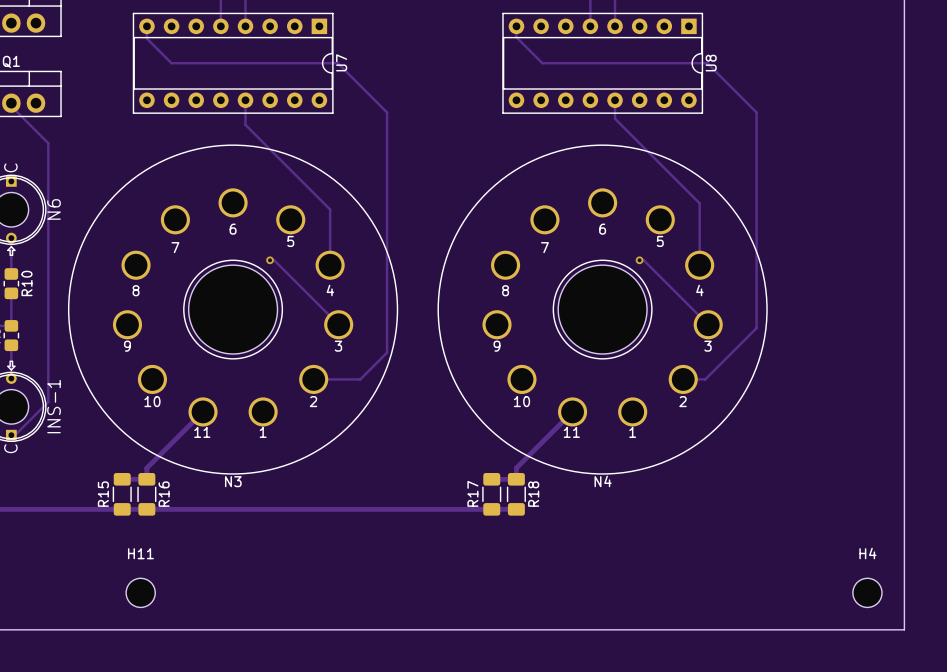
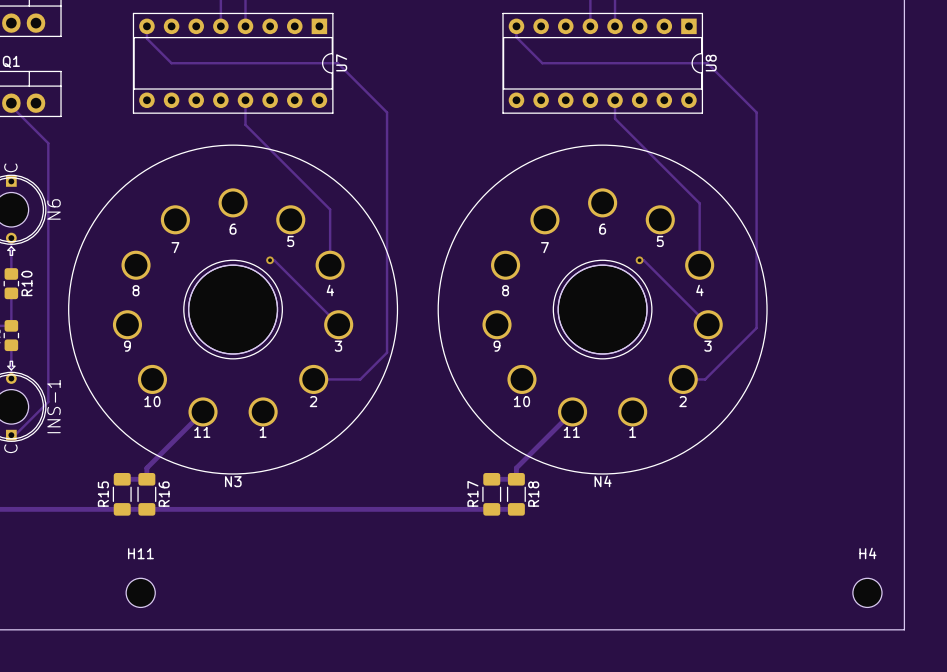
N3 footprint: [68, 144, 399, 475] -> [68, 144, 399, 475]
N4 footprint: [437, 144, 768, 475] -> [437, 144, 768, 475]

